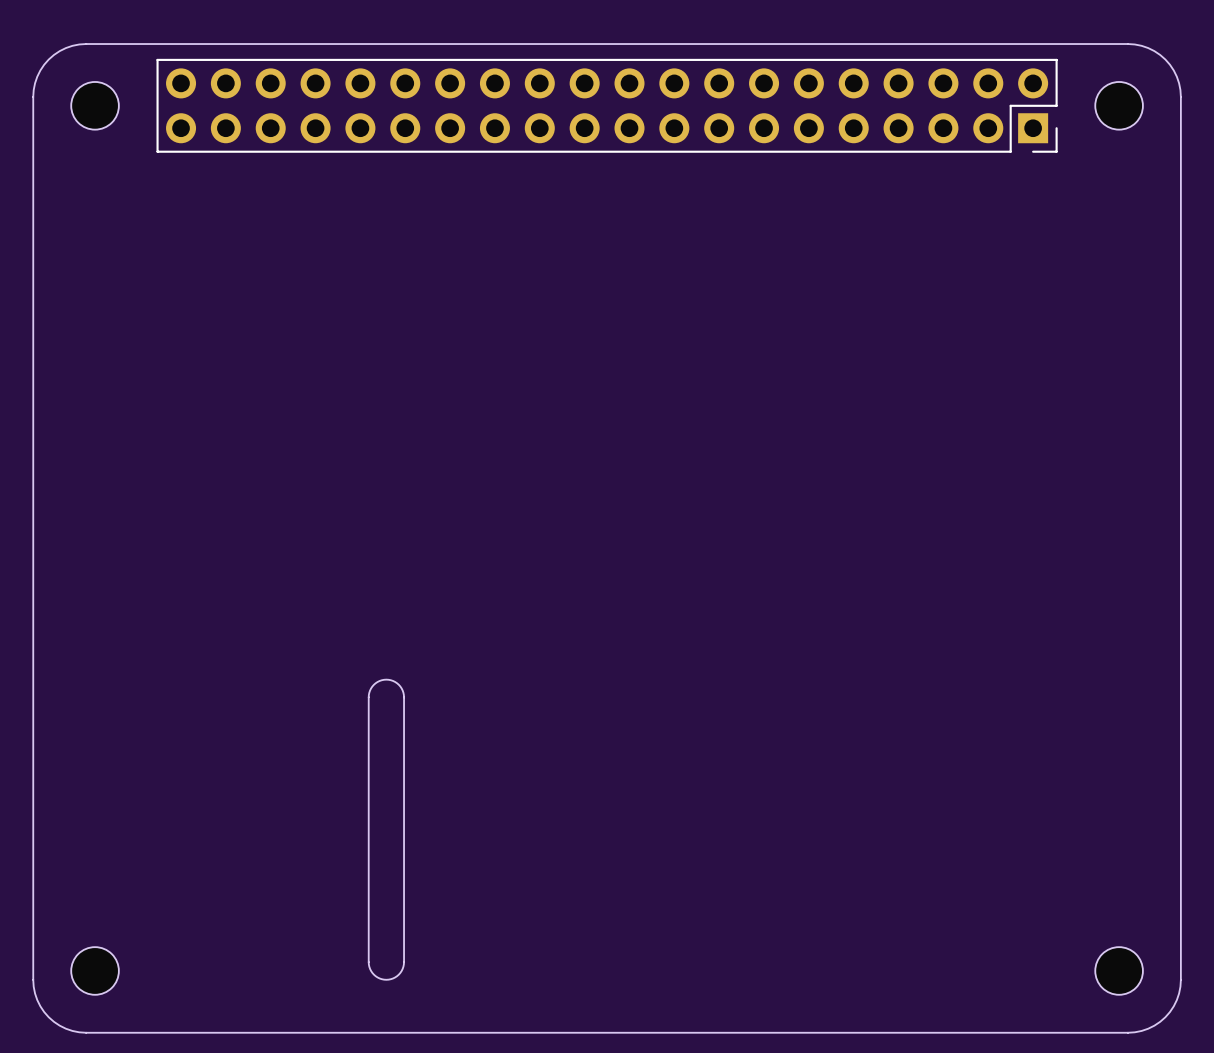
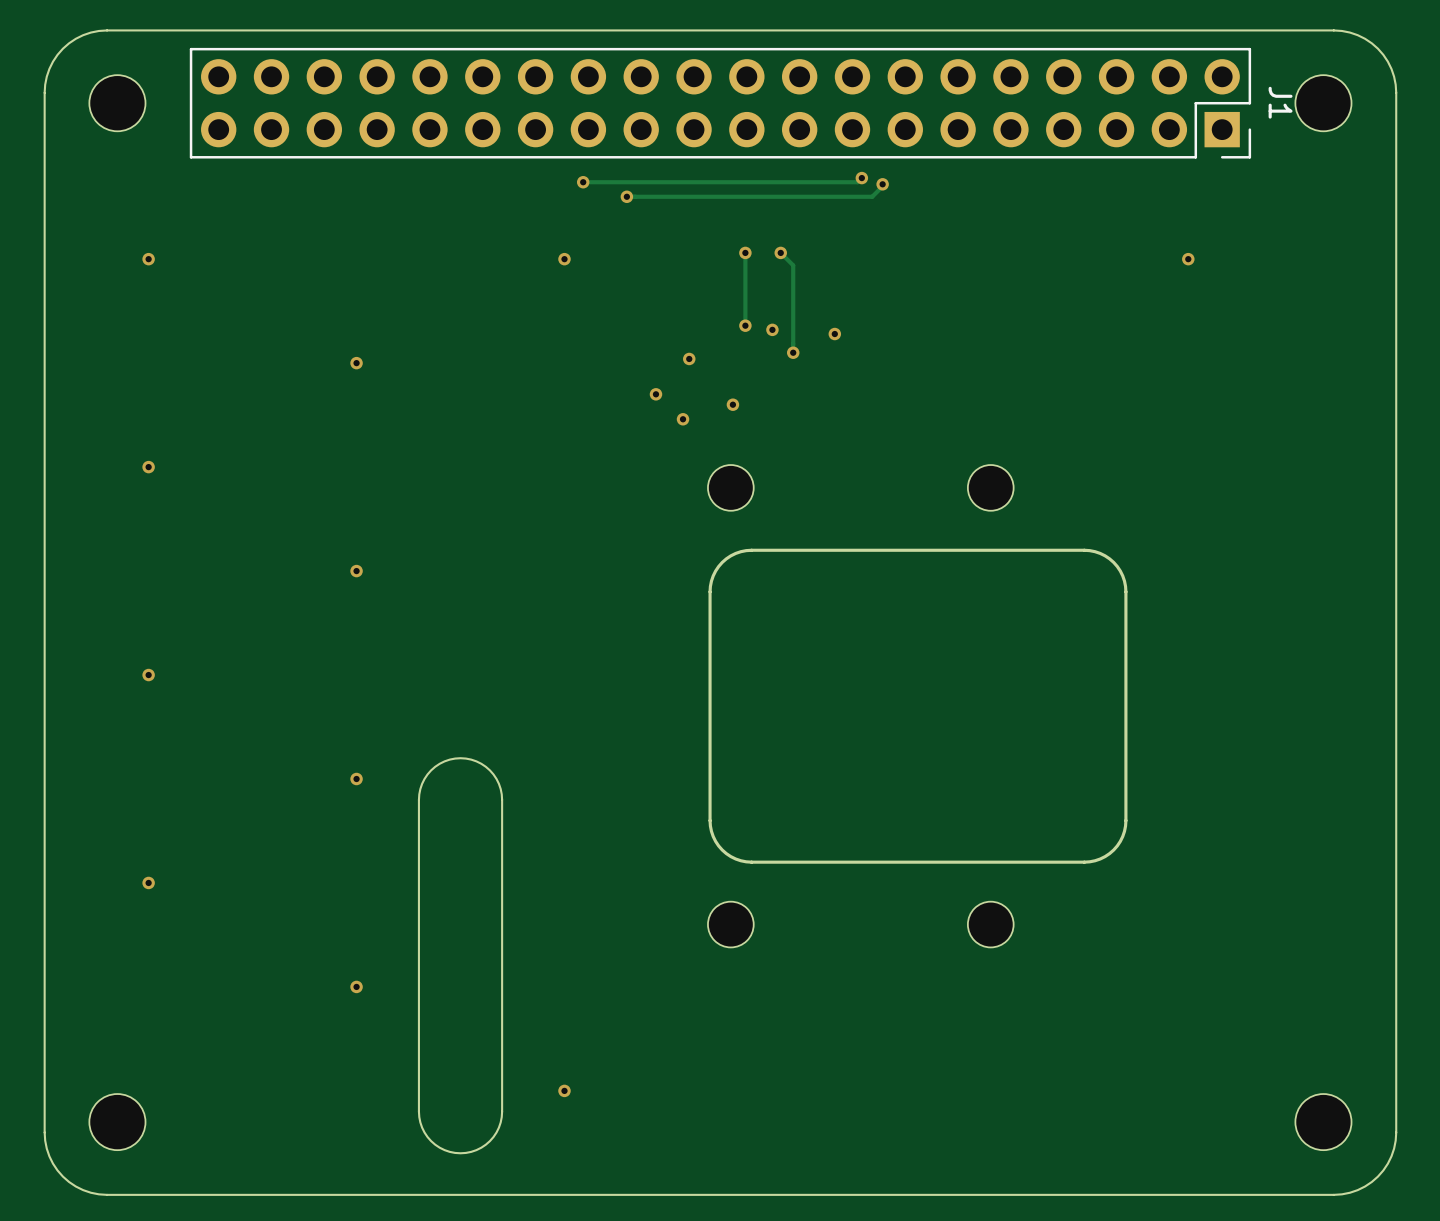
J1 name: none -> J1 (1280, 102)
track: none -> (861, 178) (857, 182) (583, 182)
via: none -> (861, 178)
via: none -> (583, 182)
track: none -> (882, 184) (872, 196) (626, 196)
via: none -> (882, 184)
via: none -> (626, 196)
track: none -> (745, 252) (745, 325)
via: none -> (745, 252)
track: none -> (780, 252) (793, 265) (793, 352)
via: none -> (780, 252)
via: none -> (148, 259)
via: none -> (564, 259)
via: none -> (1188, 259)
via: none -> (745, 325)
via: none -> (772, 329)
via: none -> (834, 334)
via: none -> (793, 352)
via: none -> (689, 358)
via: none -> (356, 363)
via: none -> (655, 394)
via: none -> (732, 404)
via: none -> (683, 419)
via: none -> (148, 467)
via: none -> (356, 571)
via: none -> (148, 675)
part: none -> (917, 706)
via: none -> (356, 779)
board edge: (404, 697) (403, 964) (397, 976) (384, 979) (372, 972) (368, 962) (368, 694) (375, 683) (388, 679) (400, 686) (404, 697) -> none
board edge: none -> (502, 799) (501, 1117) (496, 1132) (485, 1144) (471, 1151) (455, 1152) (444, 1150) (431, 1141) (422, 1127) (419, 1117) (419, 794) (422, 783) (431, 770) (444, 761) (460, 758) (476, 761) (489, 770) (498, 783) (502, 799)
via: none -> (148, 882)
via: none -> (356, 986)
via: none -> (564, 1090)

